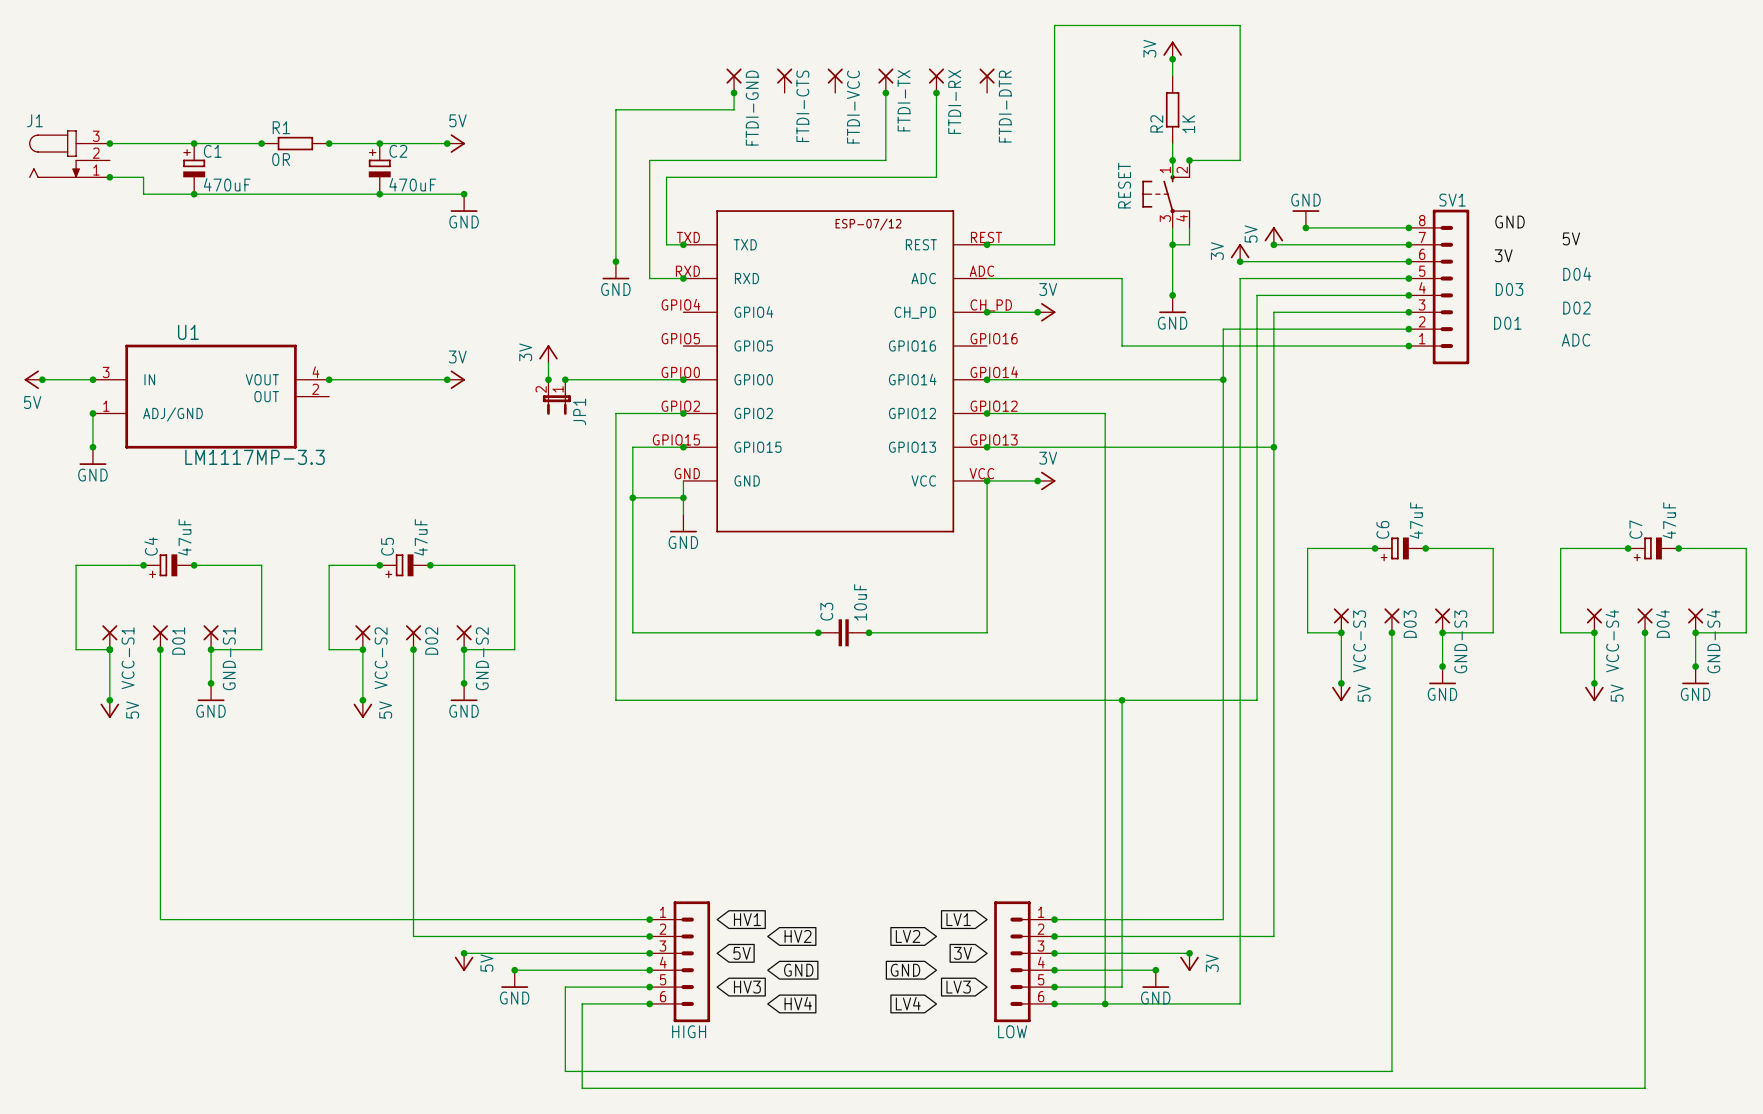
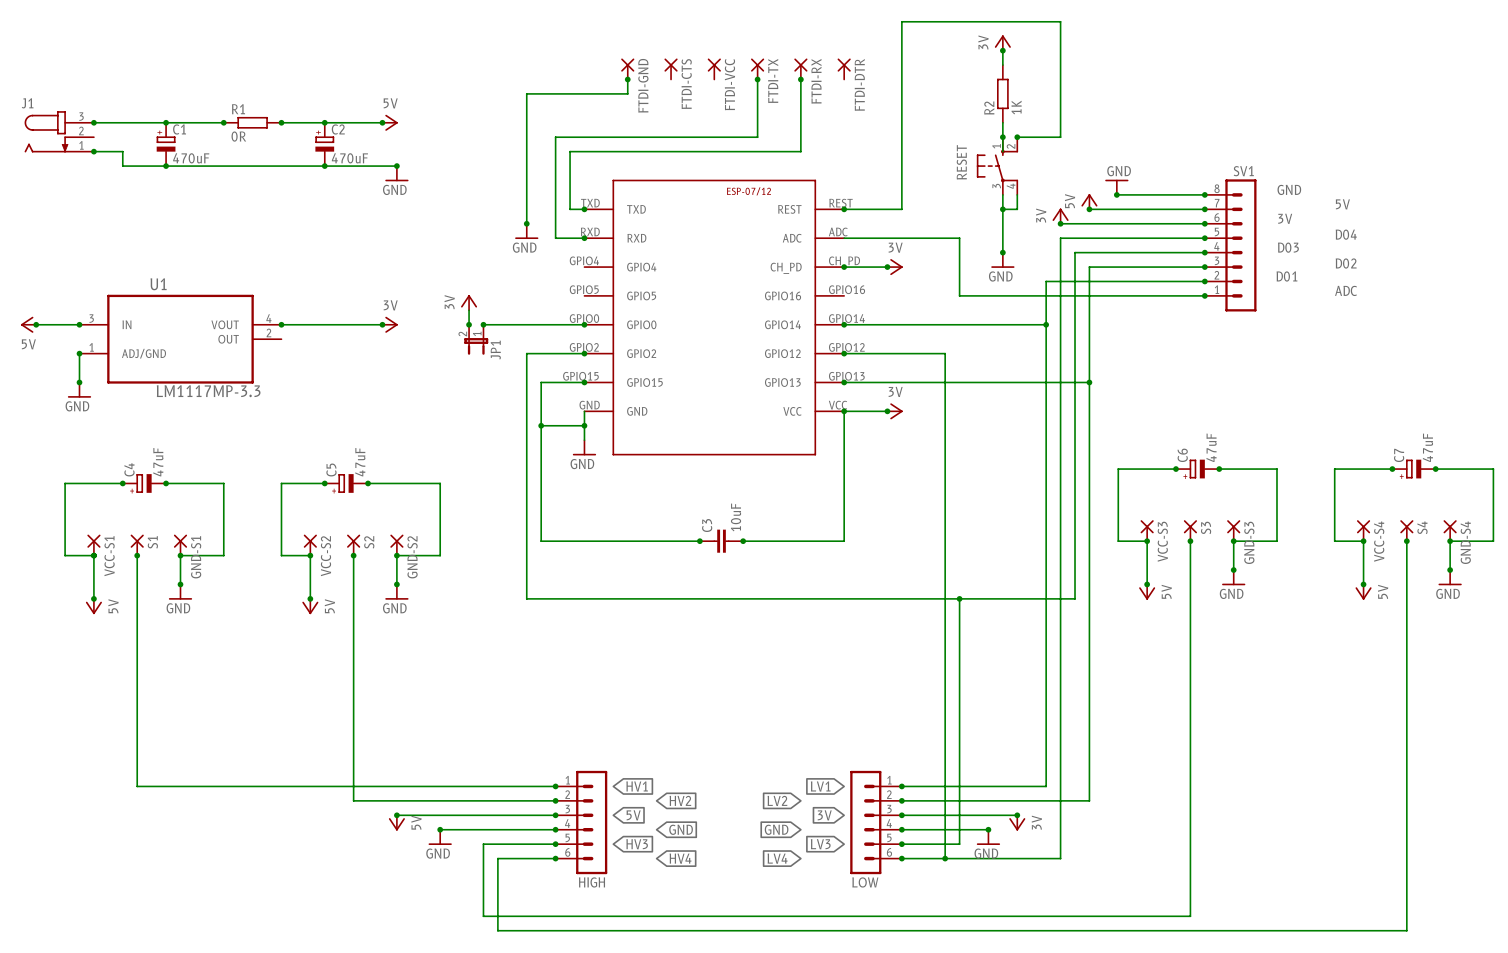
D04 name: D04 (1662, 623) -> S4 (1422, 527)
D03 name: D03 (1410, 624) -> S3 (1206, 527)
D01 name: D01 (178, 641) -> S1 (152, 542)
D02 name: D02 (431, 641) -> S2 (369, 542)

